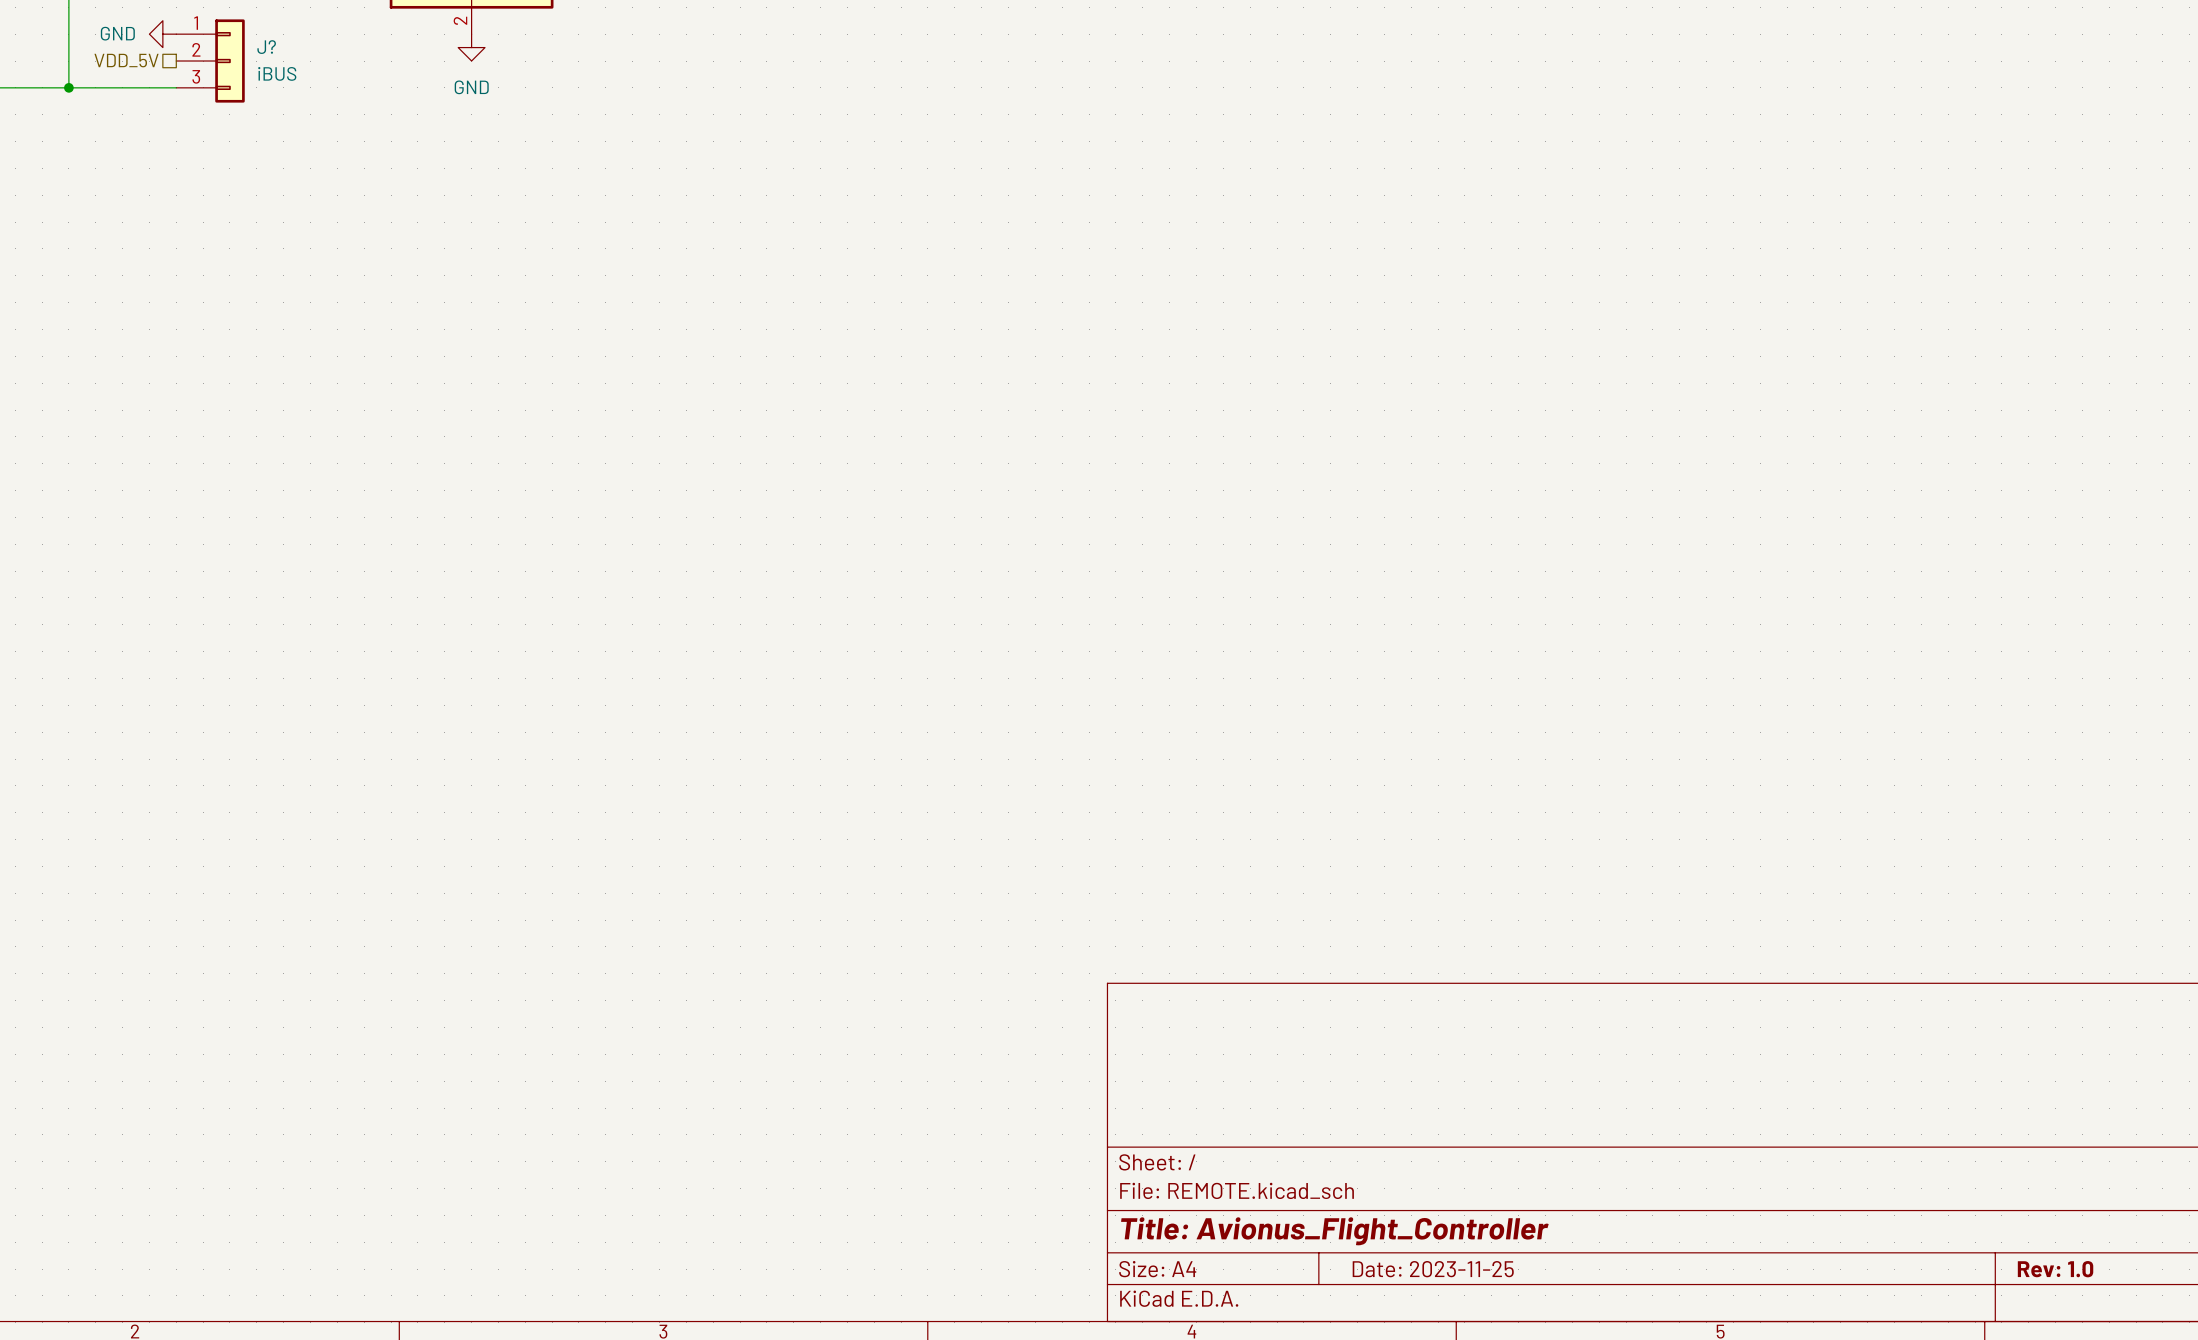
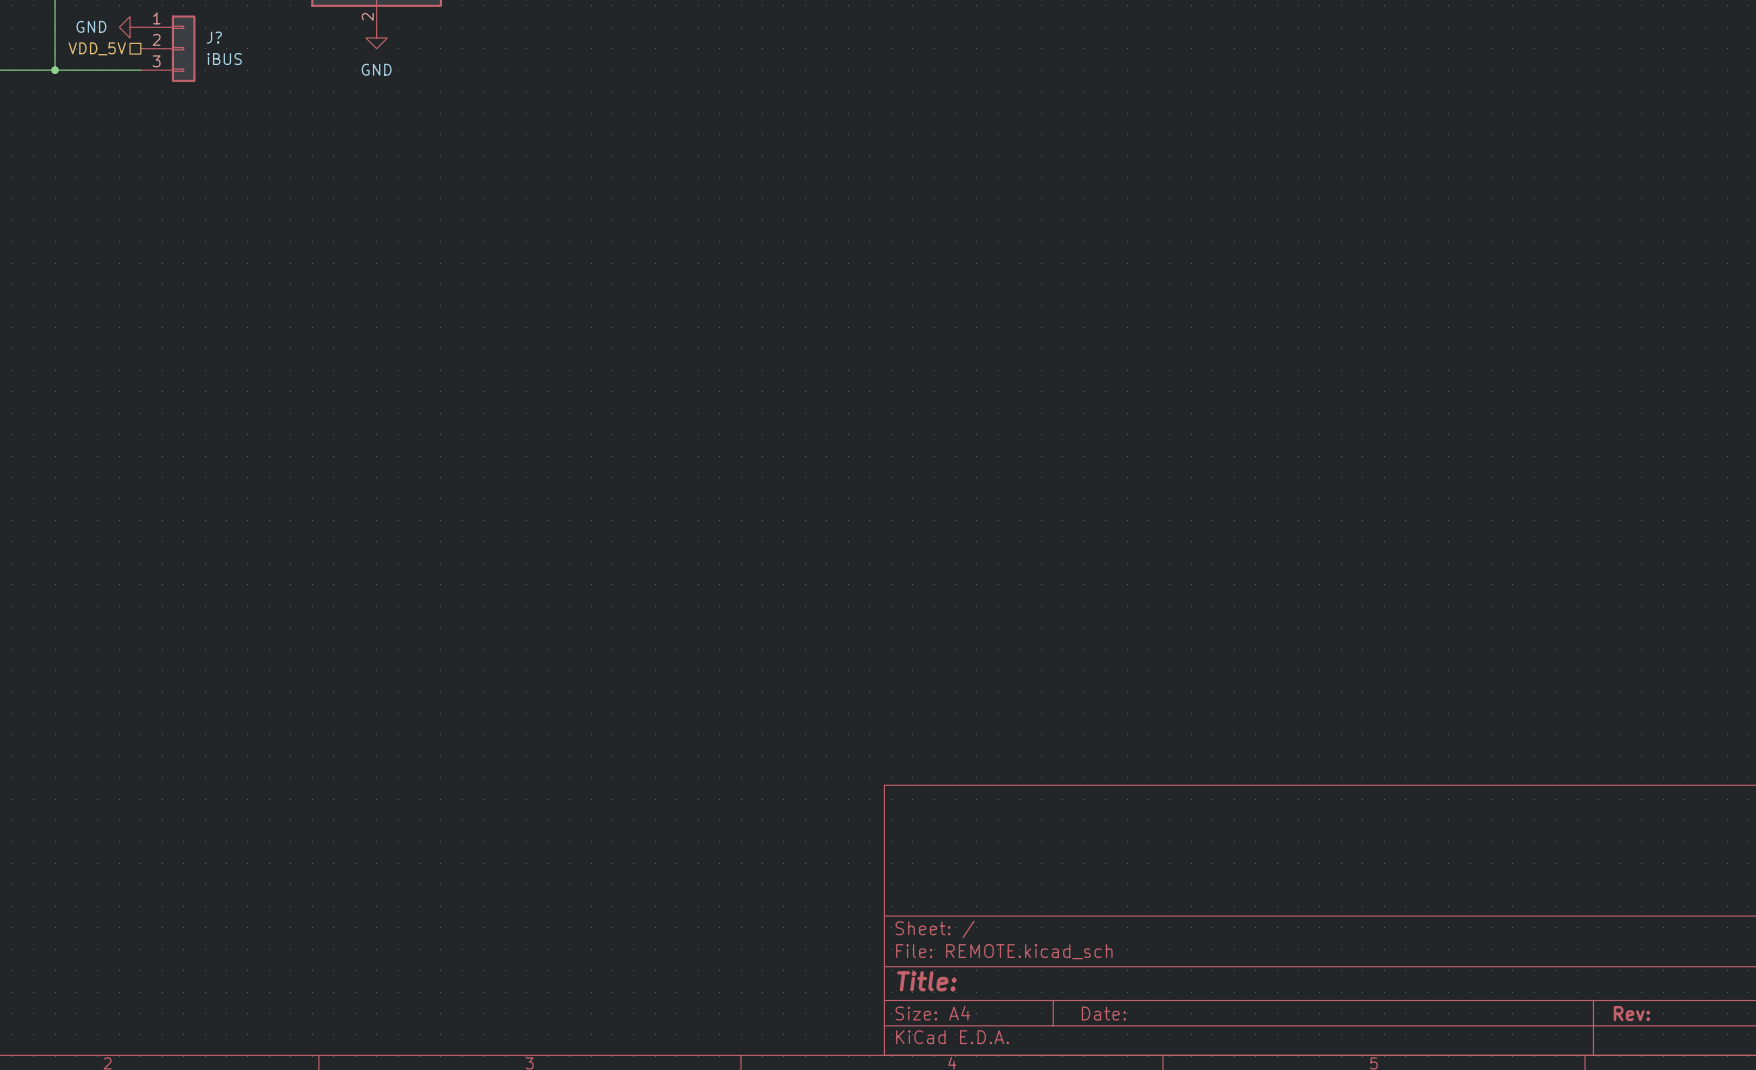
title block: Title: Avionus_Flight_Controller (1334, 1231) -> Title: (926, 981)
title block: Date: 2023-11-25 (1433, 1269) -> Date: (1103, 1013)
title block: Rev: 1.0 (2055, 1269) -> Rev: (1631, 1013)

